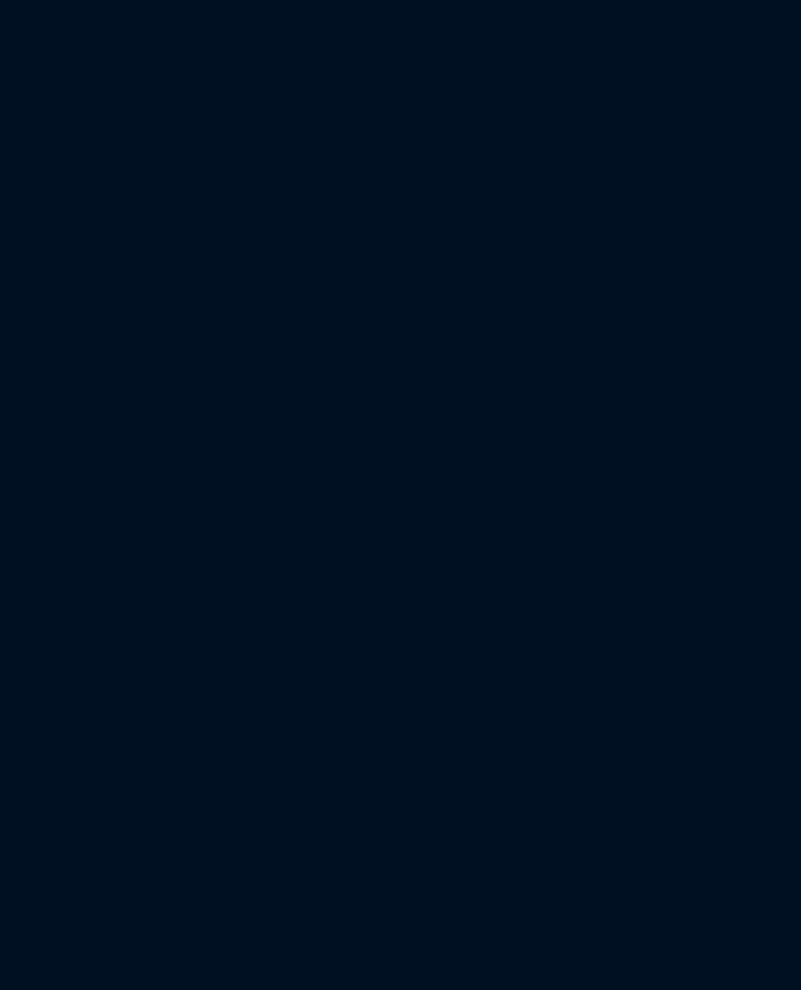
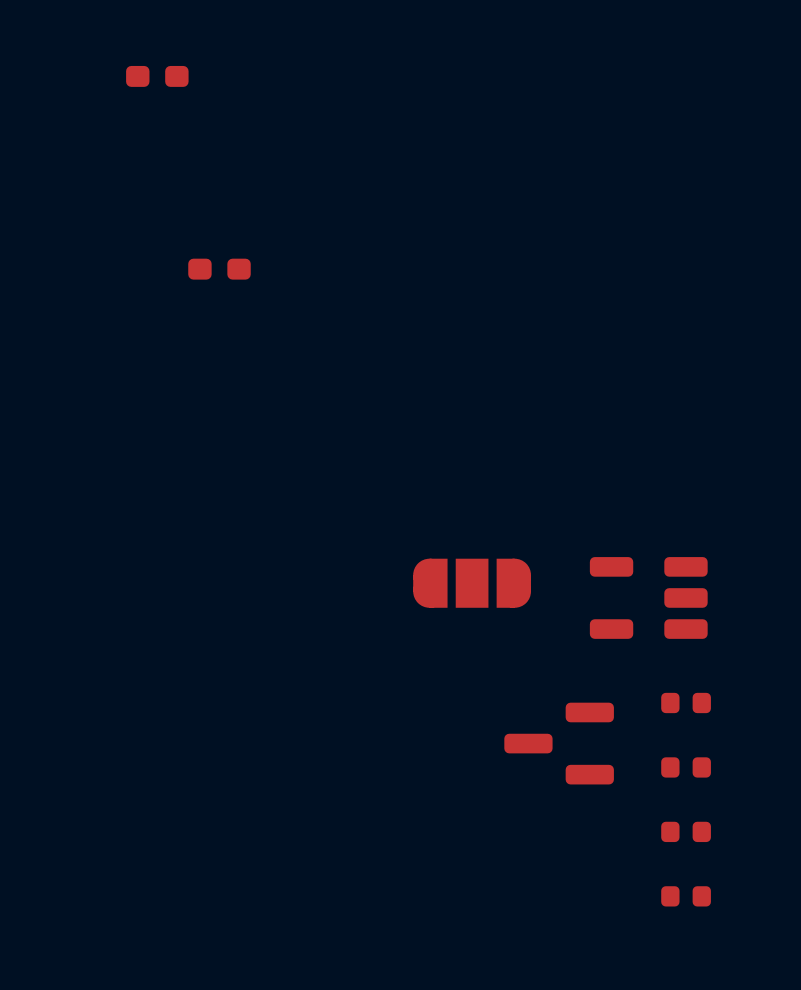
part: none -> (157, 76)
part: none -> (219, 269)
part: none -> (472, 583)
part: none -> (648, 597)
part: none -> (686, 702)
part: none -> (559, 743)
part: none -> (686, 767)
part: none -> (686, 831)
part: none -> (686, 896)

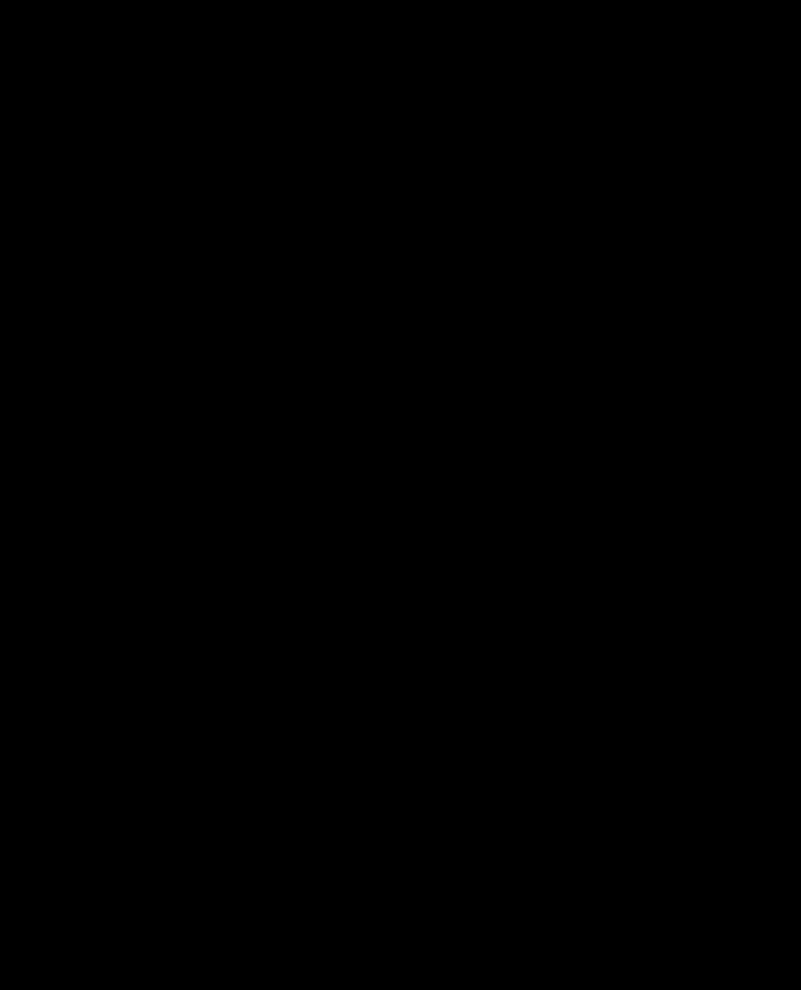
part: (157, 76) -> none
part: (219, 269) -> none
part: (472, 583) -> none
part: (648, 597) -> none
part: (686, 702) -> none
part: (559, 743) -> none
part: (686, 767) -> none
part: (686, 831) -> none
part: (686, 896) -> none

